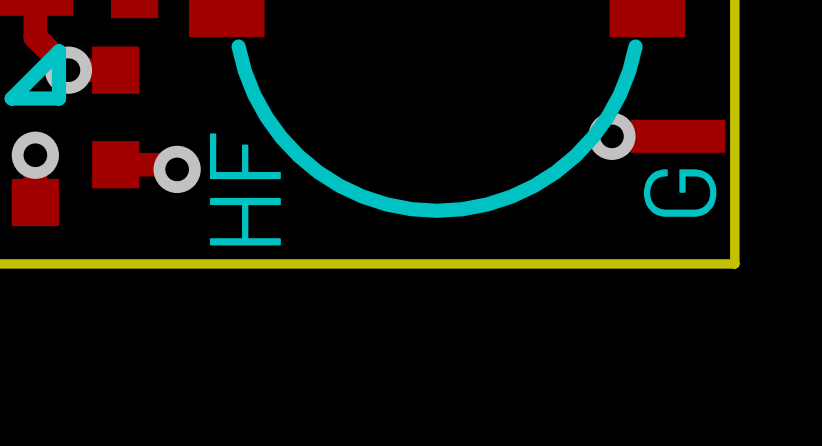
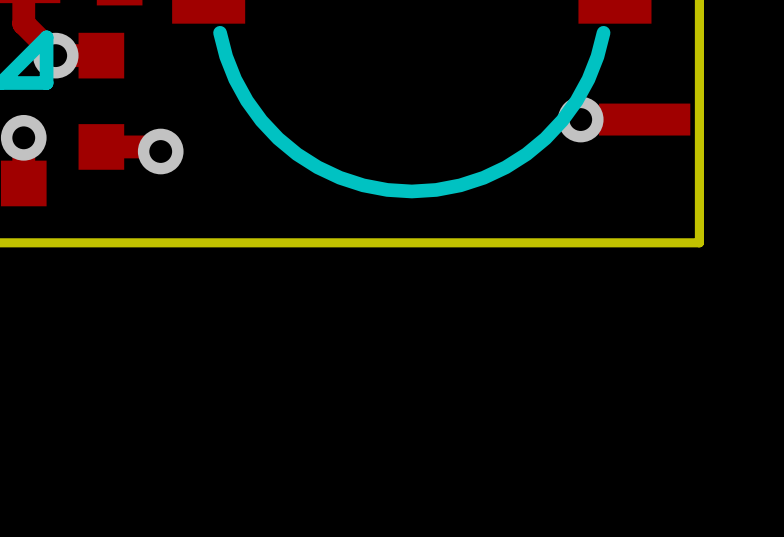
text: HF (245, 189) -> none
text: G (680, 193) -> none

